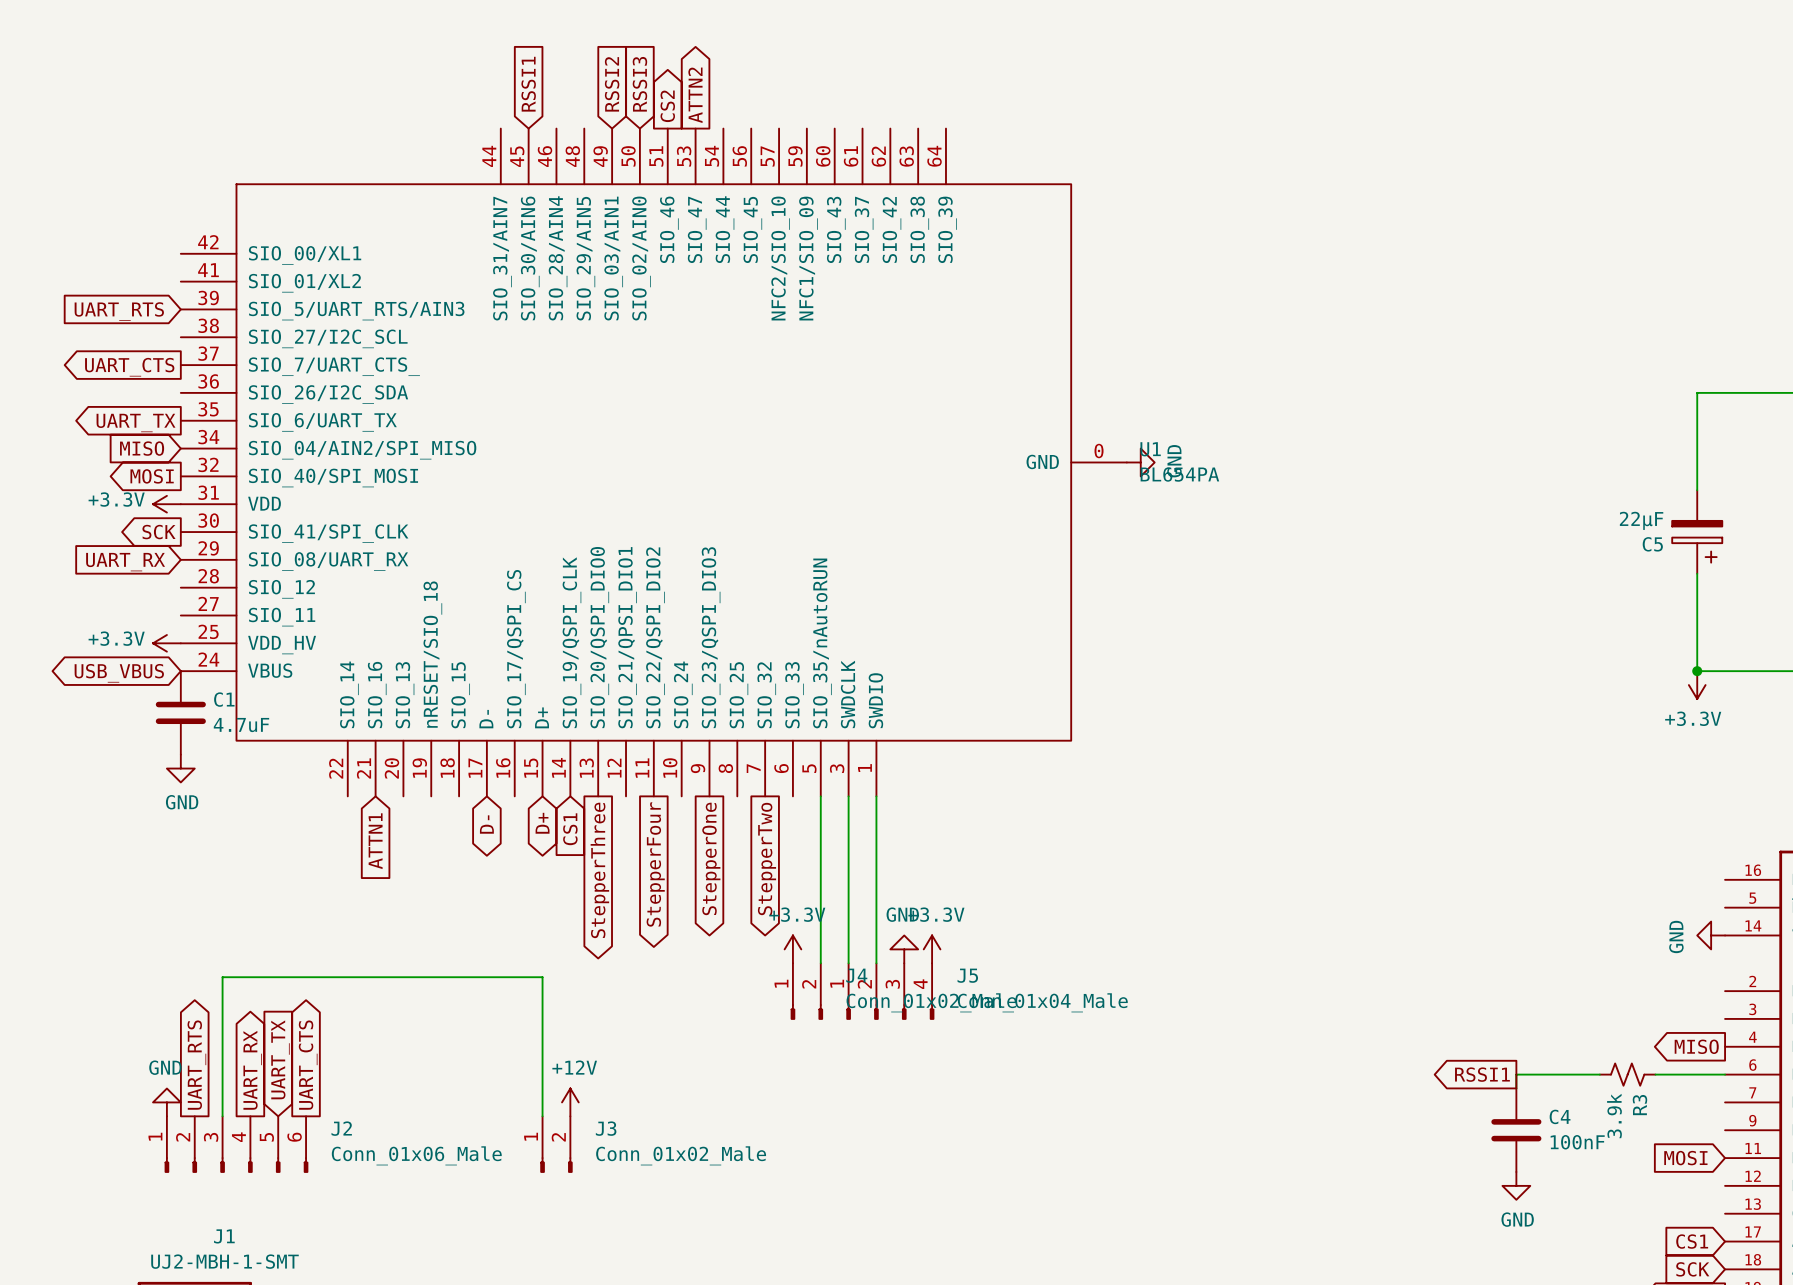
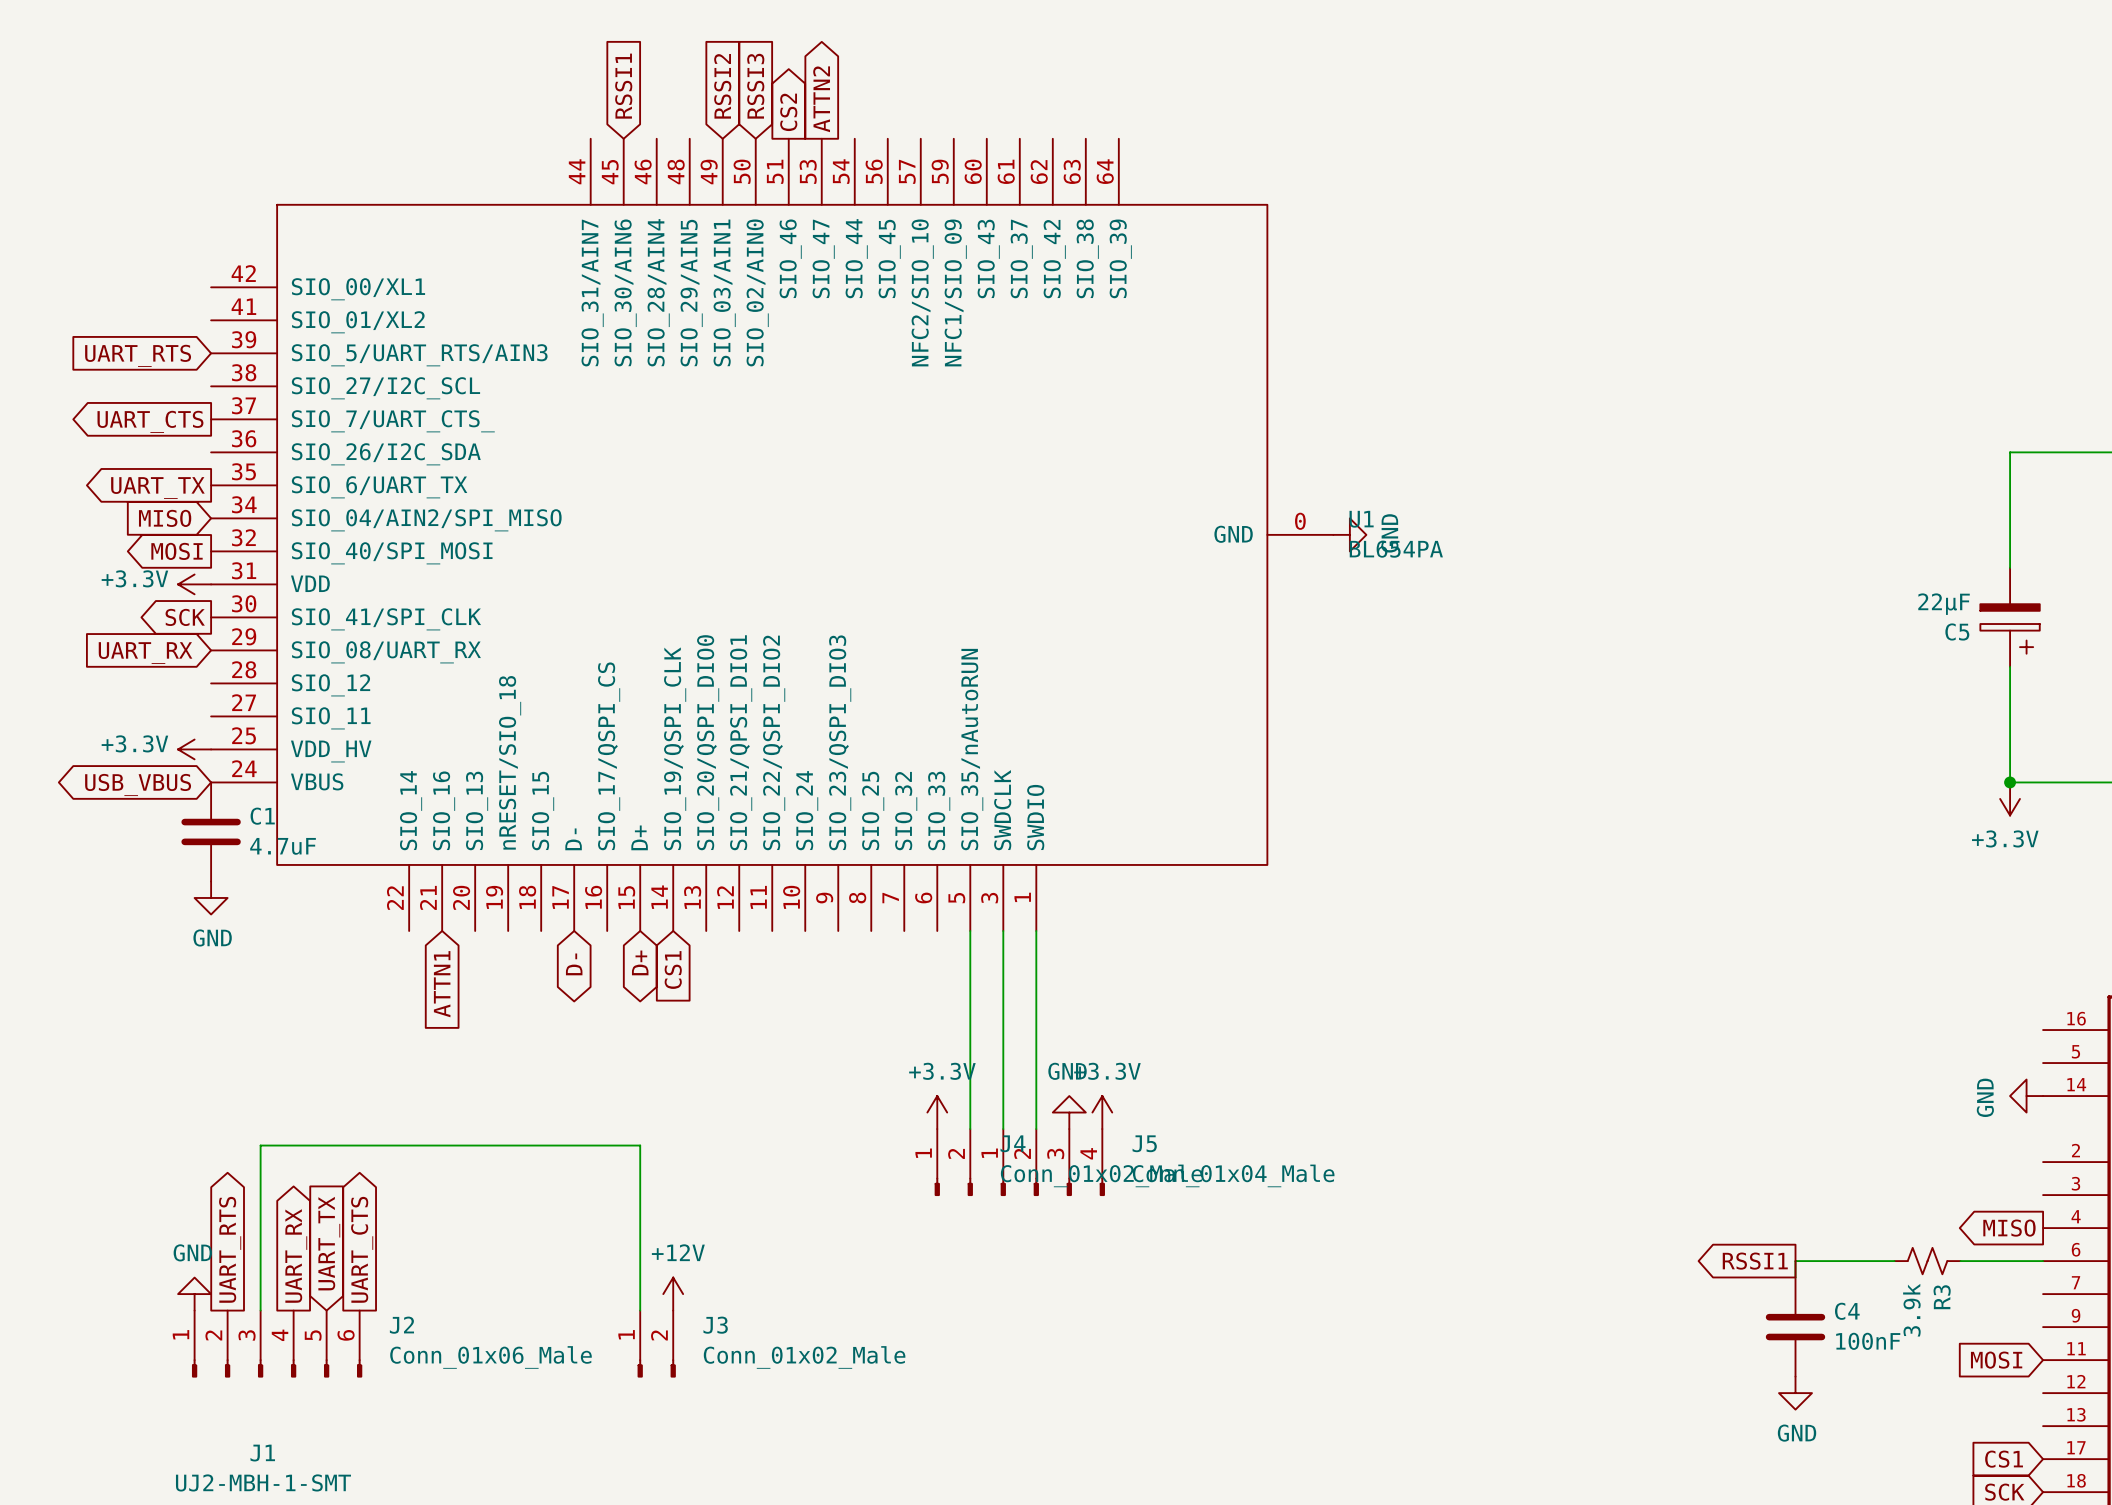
global label: StepperOne (711, 858) -> none
global label: StepperTwo (766, 859) -> none
global label: StepperFour (655, 864) -> none
global label: StepperThree (599, 870) -> none

